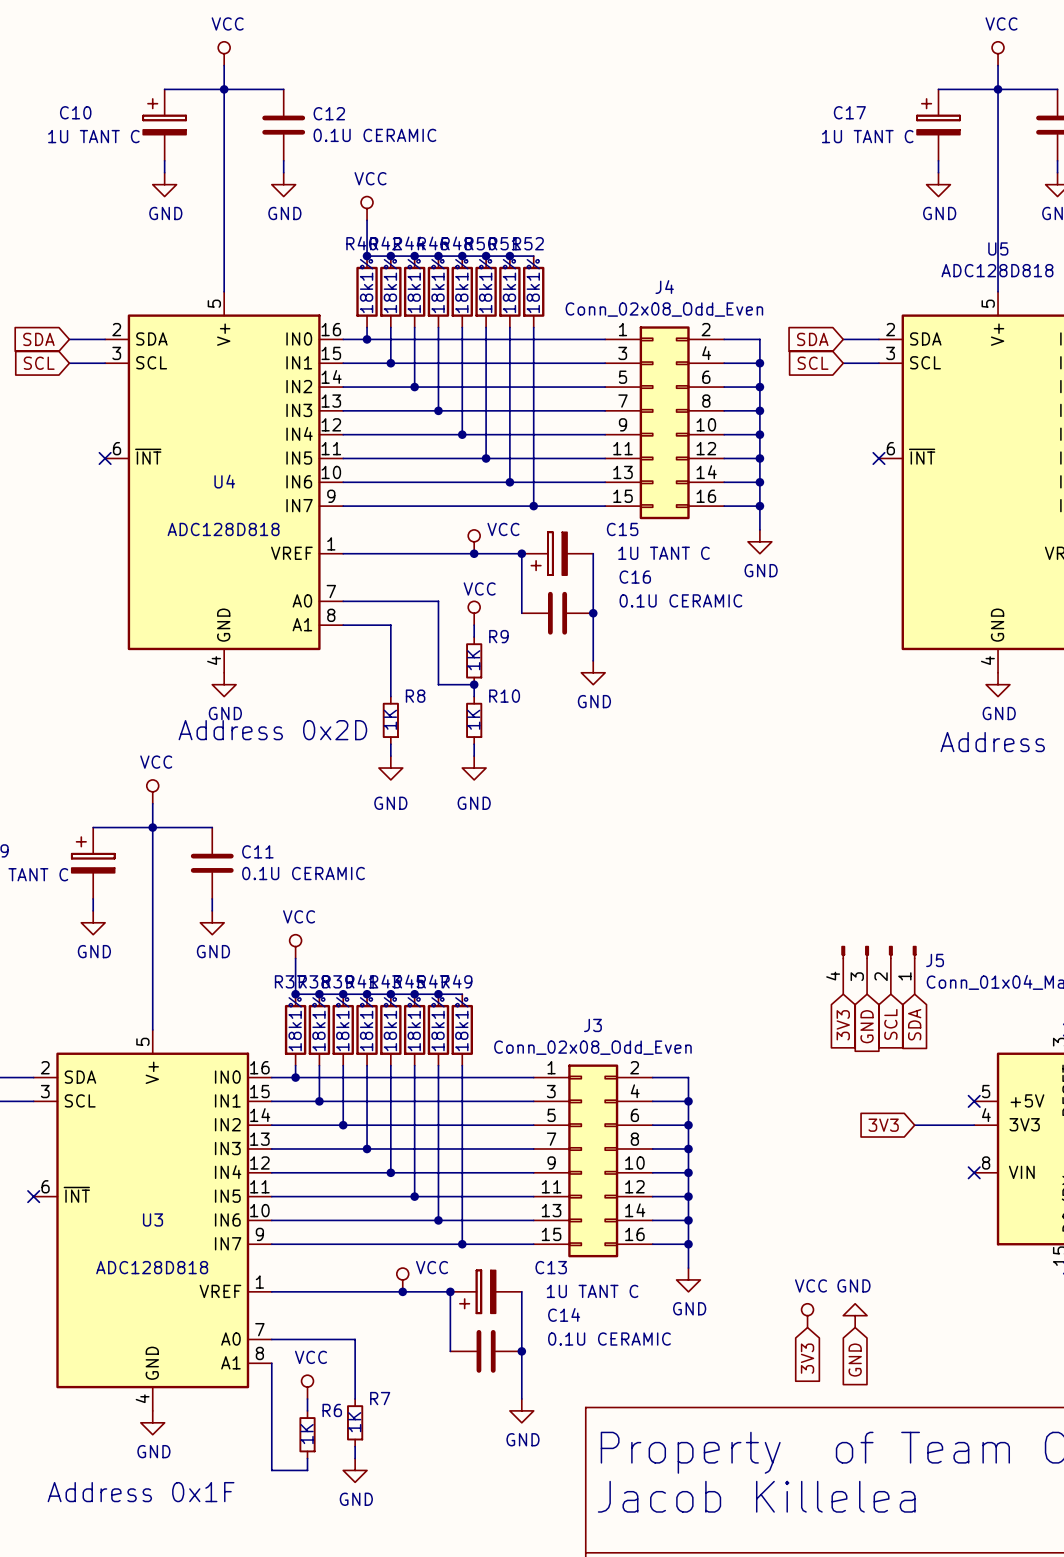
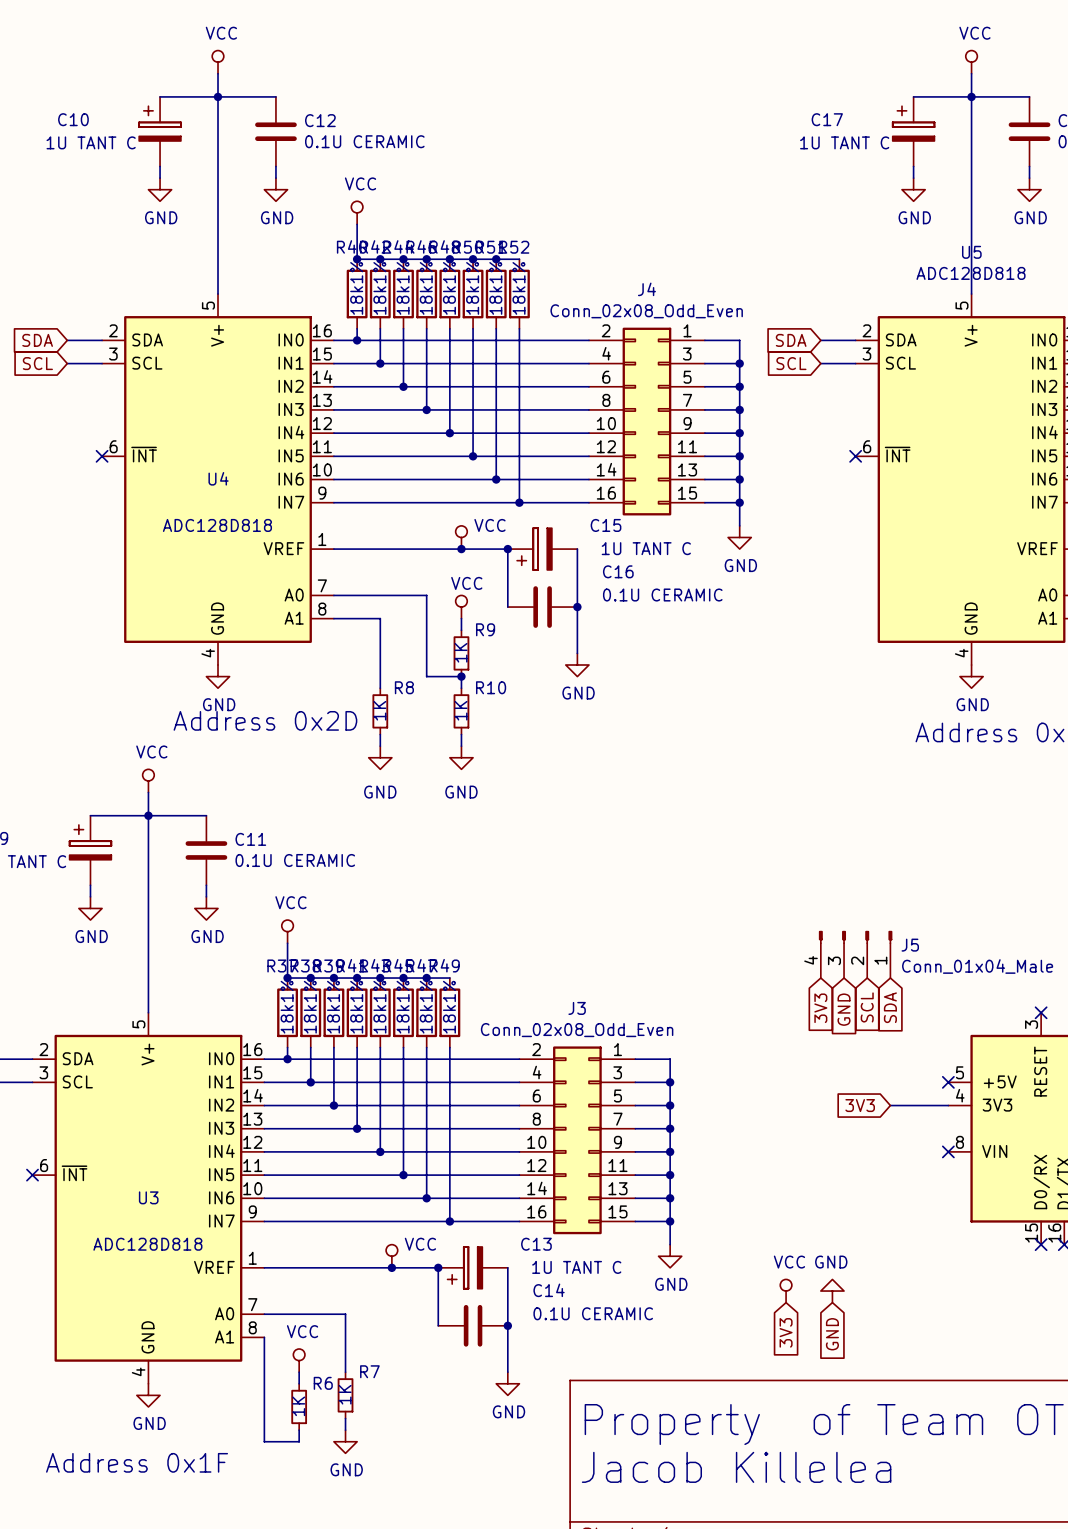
J4 flip: as is (664, 422) -> left-right (646, 421)
J3 flip: as is (593, 1160) -> left-right (577, 1140)

